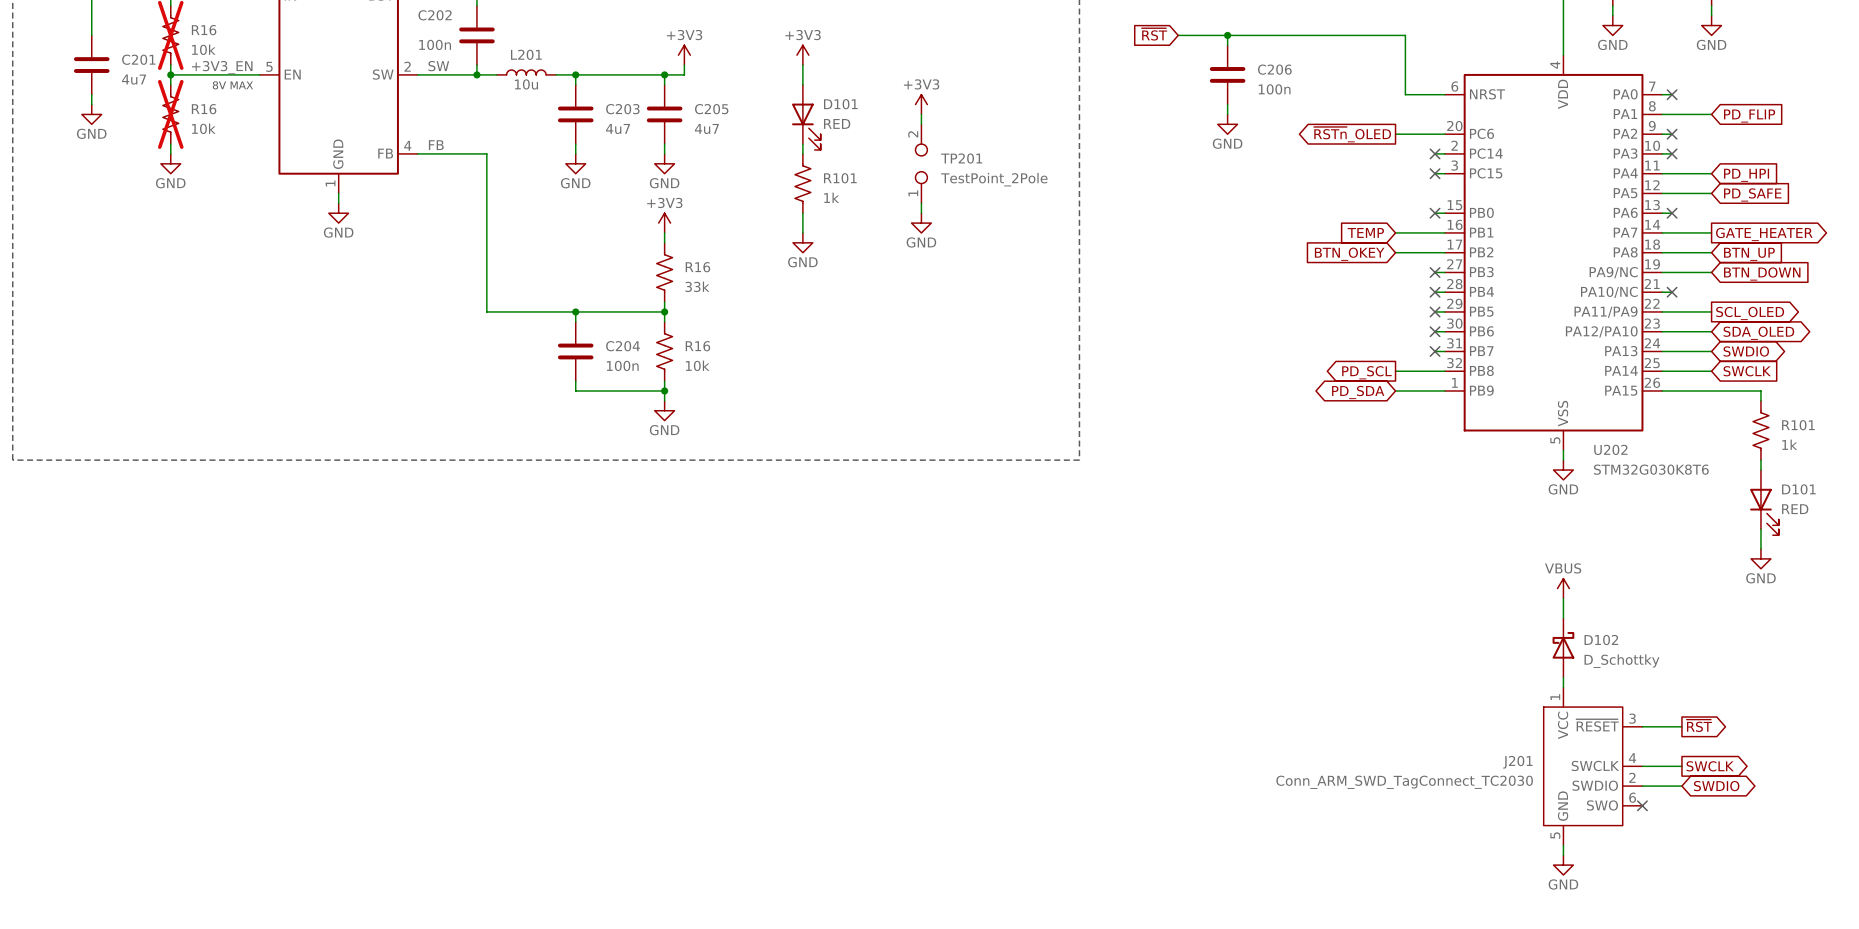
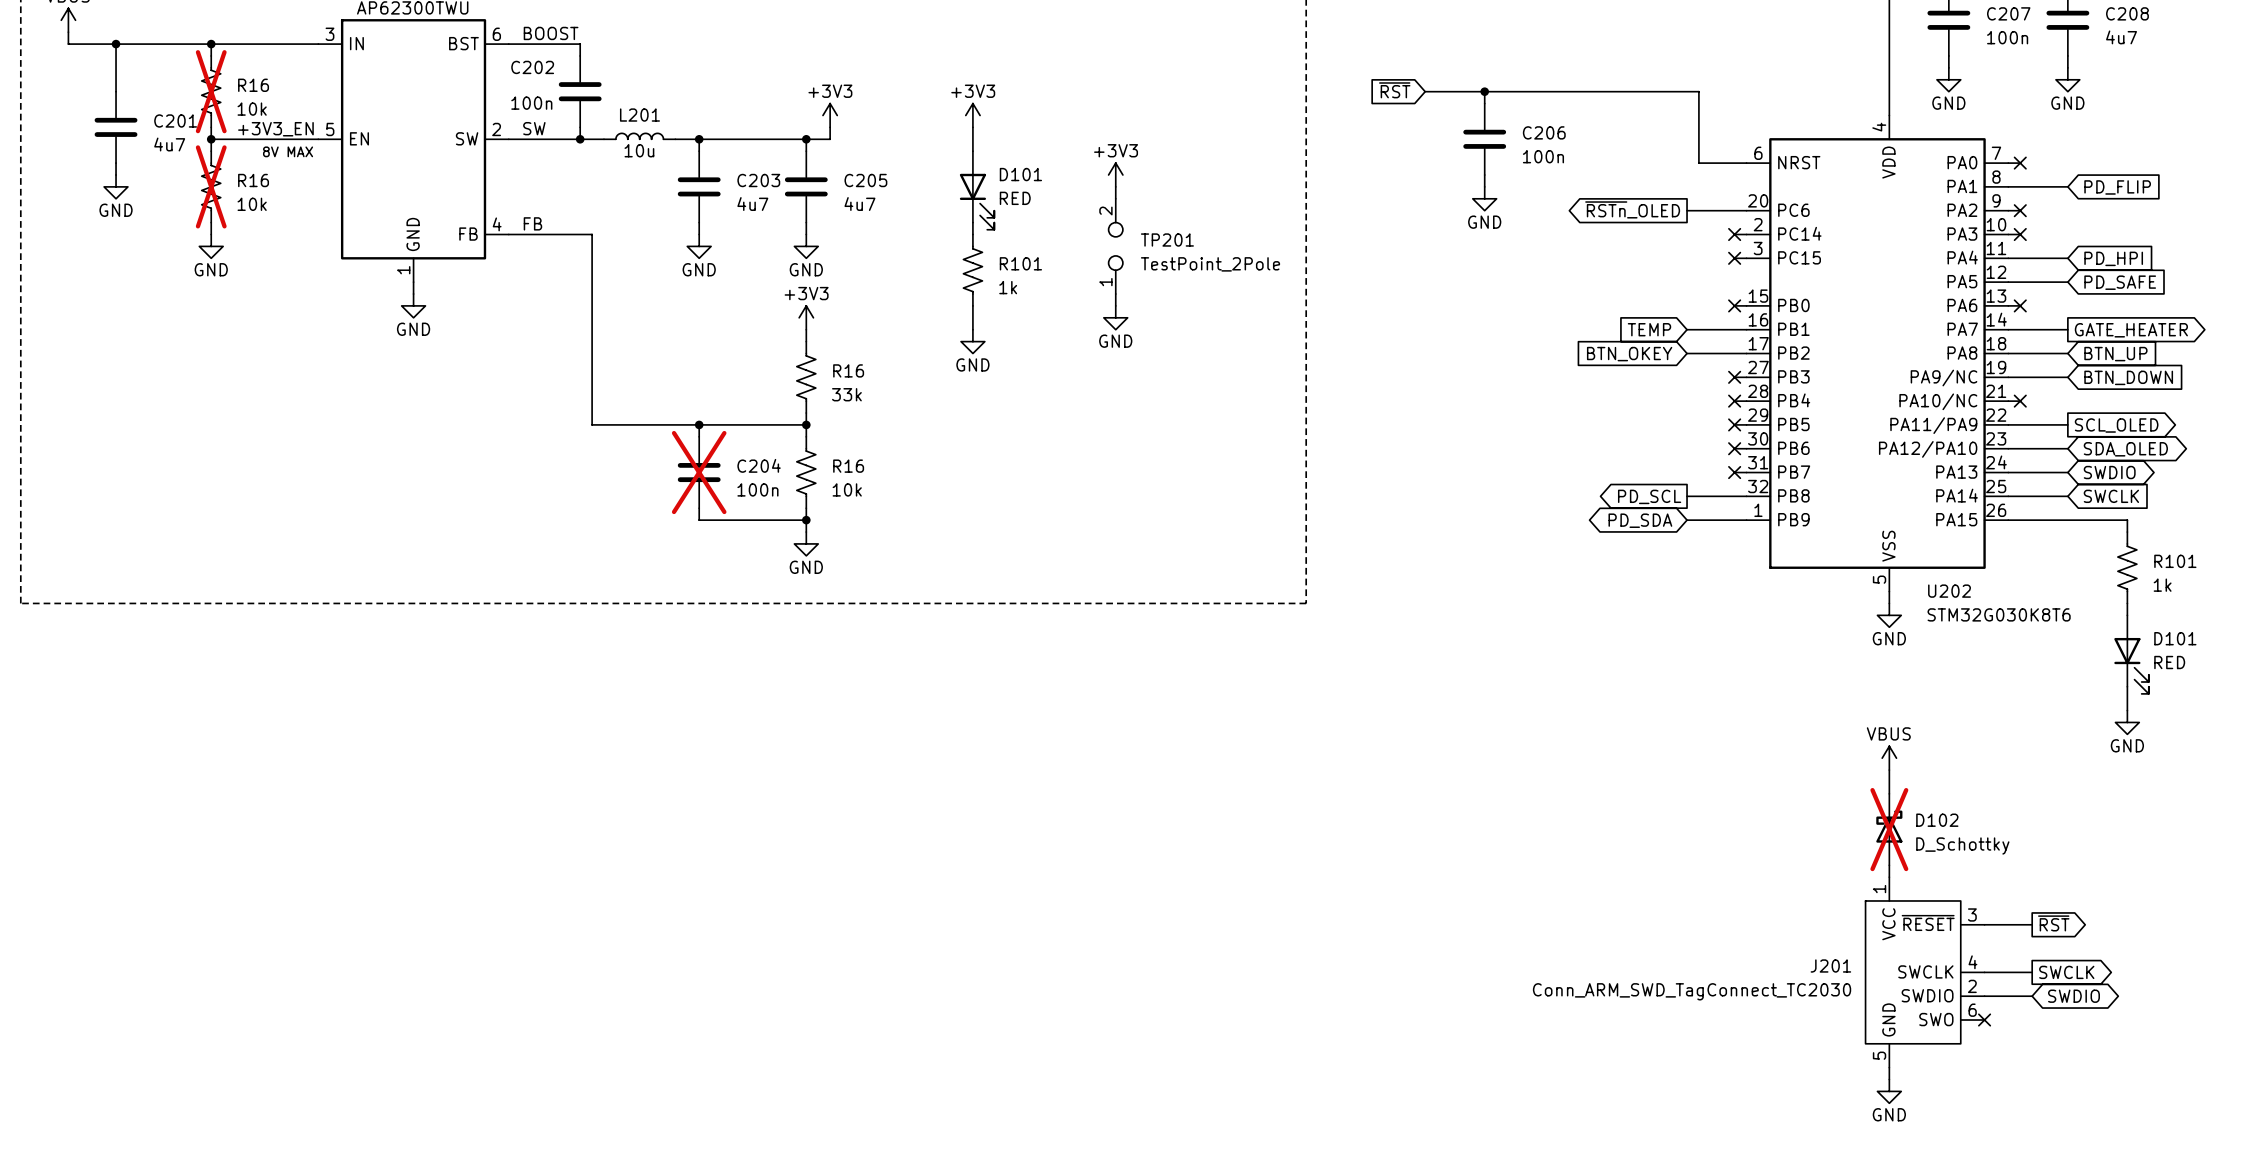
C204 do-not-place cross: none -> (699, 472)
D102 do-not-place cross: none -> (1889, 829)

